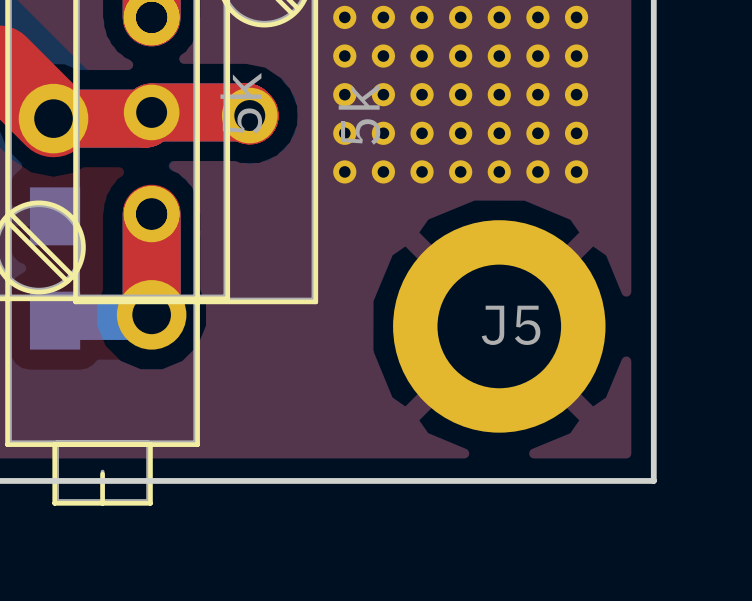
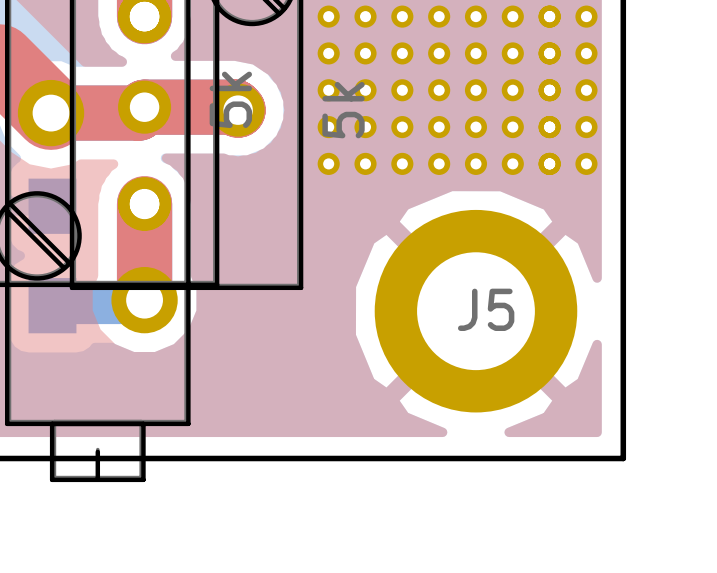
part: none -> (586, 16)
part: none -> (586, 53)
part: none -> (586, 90)
part: none -> (586, 127)
part: none -> (586, 163)

